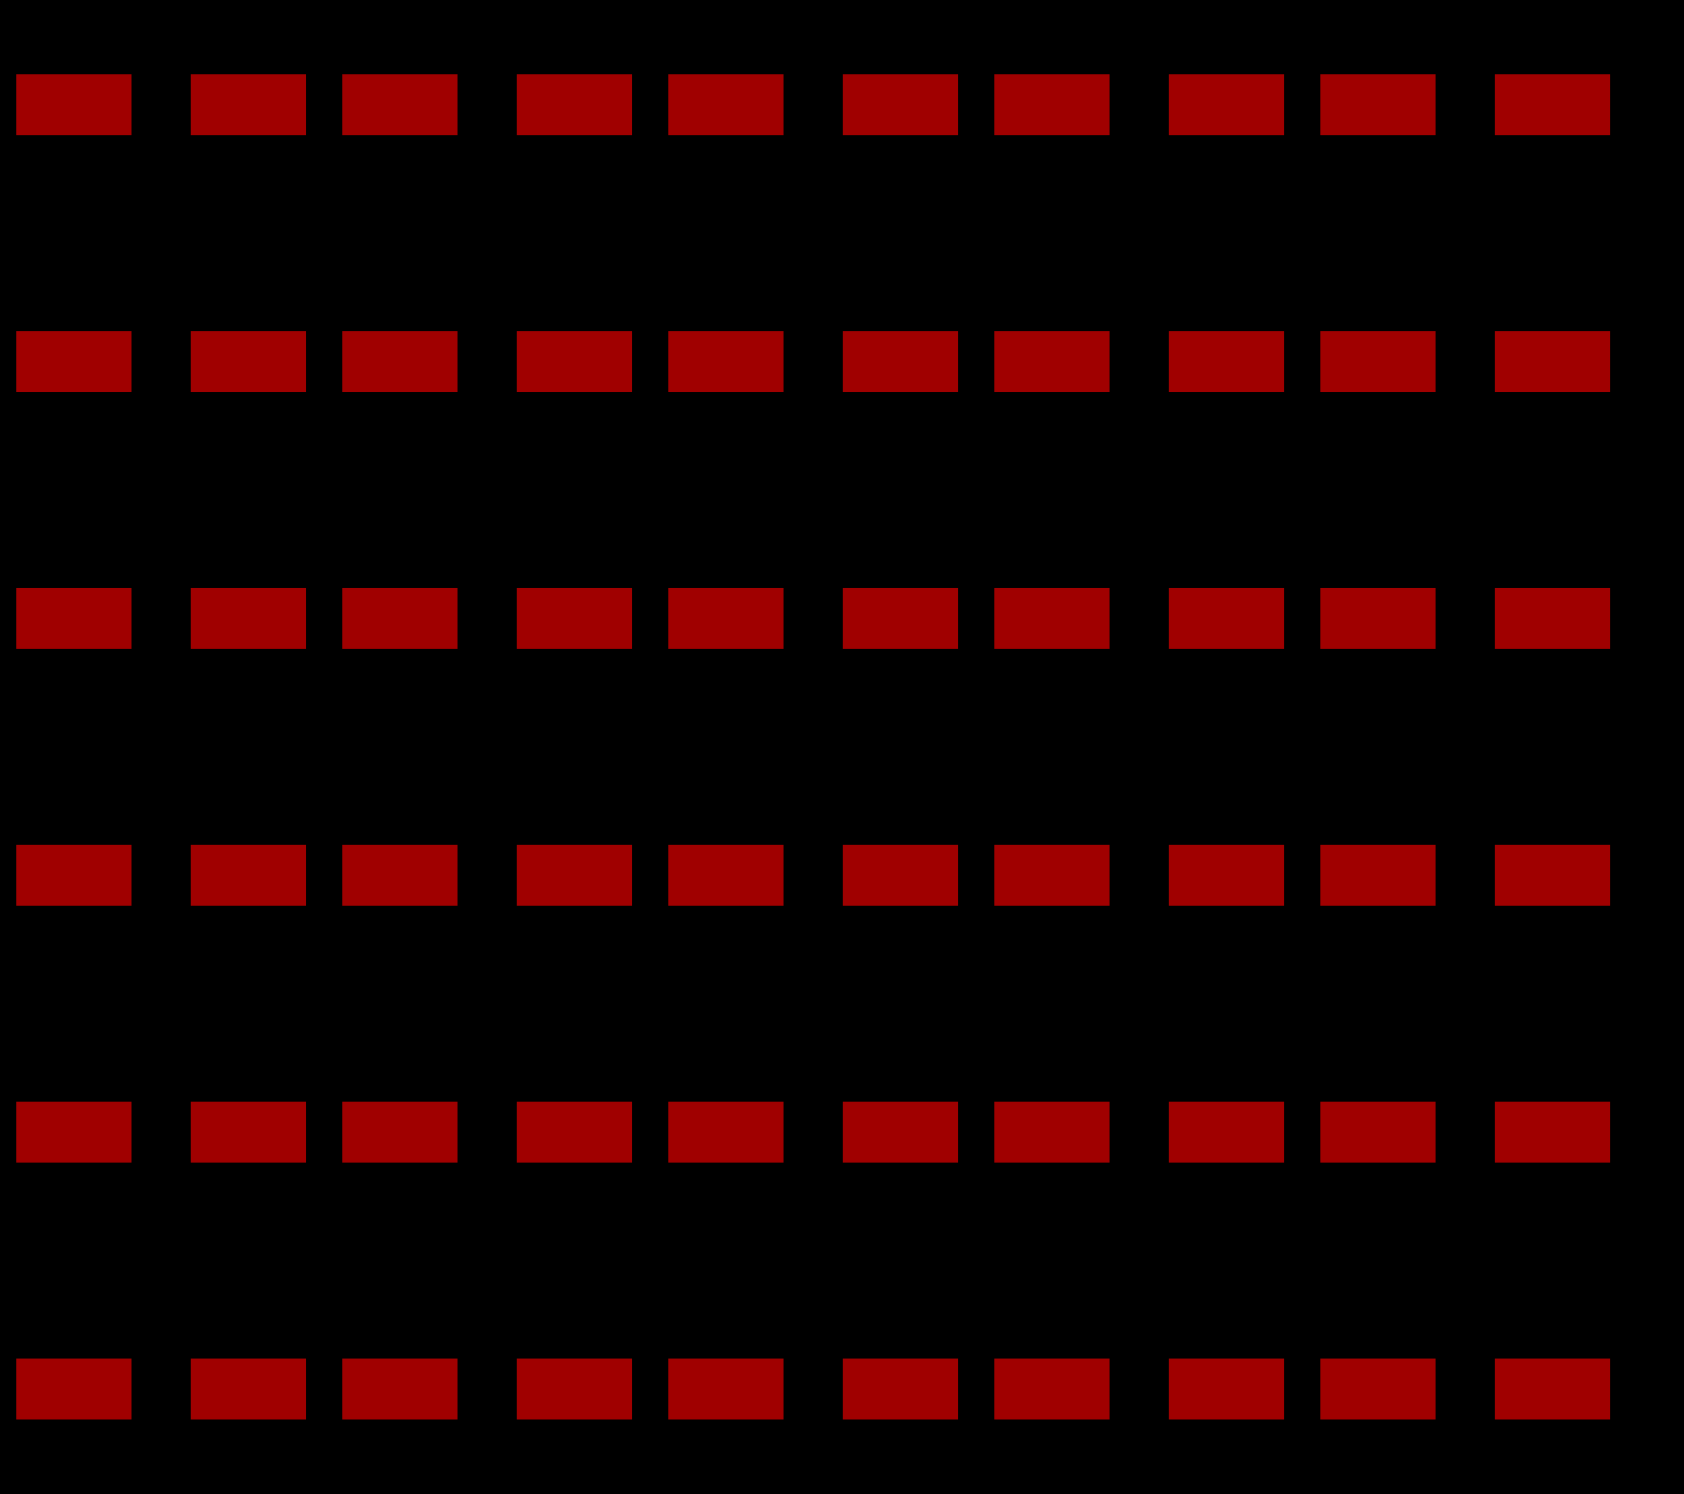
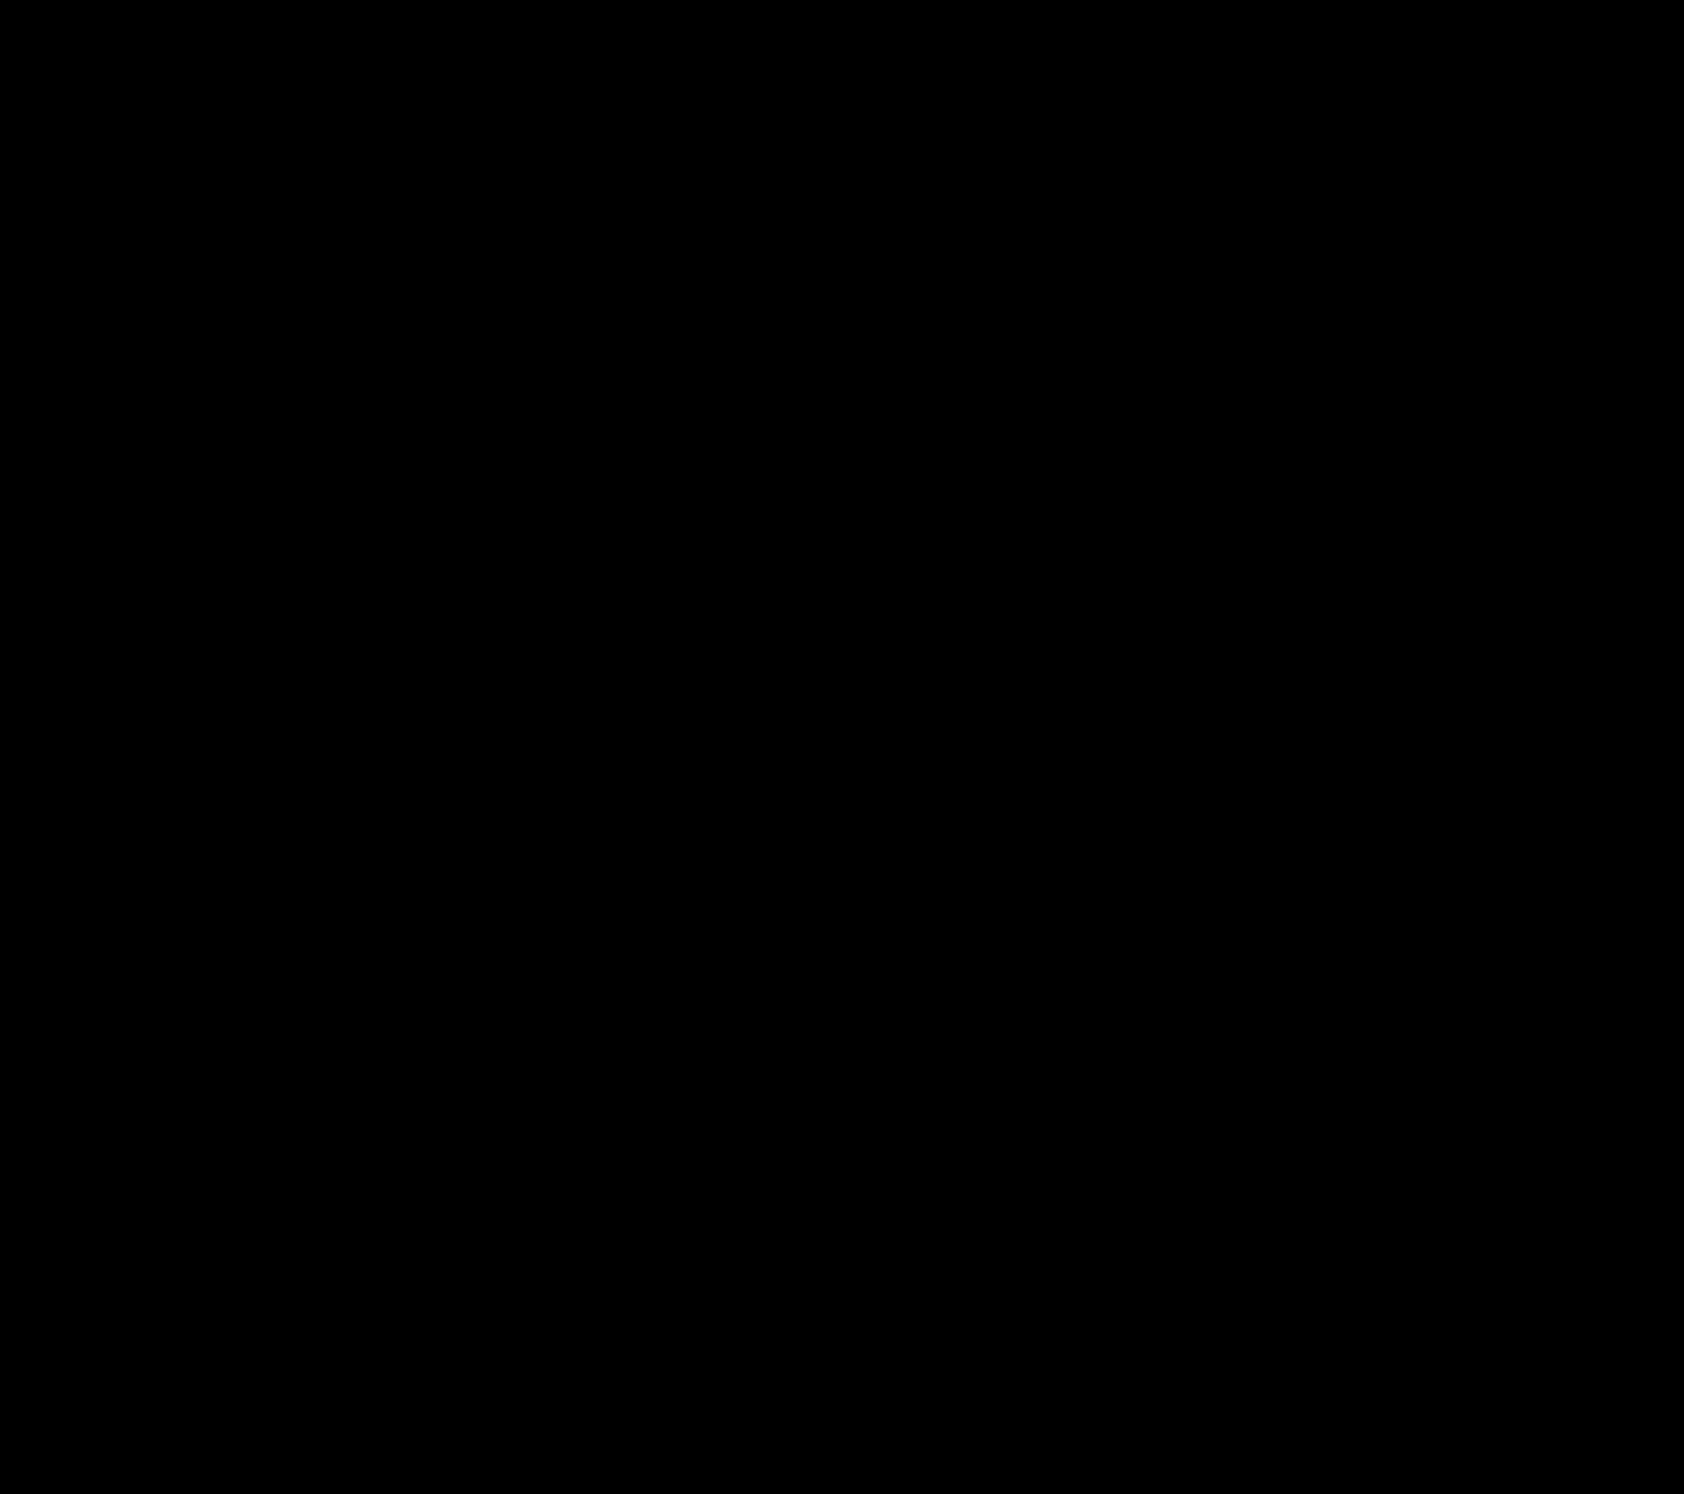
part: (161, 104) -> none
part: (487, 104) -> none
part: (813, 104) -> none
part: (1139, 104) -> none
part: (1465, 104) -> none
part: (161, 361) -> none
part: (487, 361) -> none
part: (813, 361) -> none
part: (1139, 361) -> none
part: (1465, 361) -> none
part: (161, 618) -> none
part: (487, 618) -> none
part: (813, 618) -> none
part: (1139, 618) -> none
part: (1465, 618) -> none
part: (161, 875) -> none
part: (487, 875) -> none
part: (813, 875) -> none
part: (1139, 875) -> none
part: (1465, 875) -> none
part: (161, 1132) -> none
part: (487, 1132) -> none
part: (813, 1132) -> none
part: (1139, 1132) -> none
part: (1465, 1132) -> none
part: (161, 1389) -> none
part: (487, 1389) -> none
part: (813, 1389) -> none
part: (1139, 1389) -> none
part: (1465, 1389) -> none

